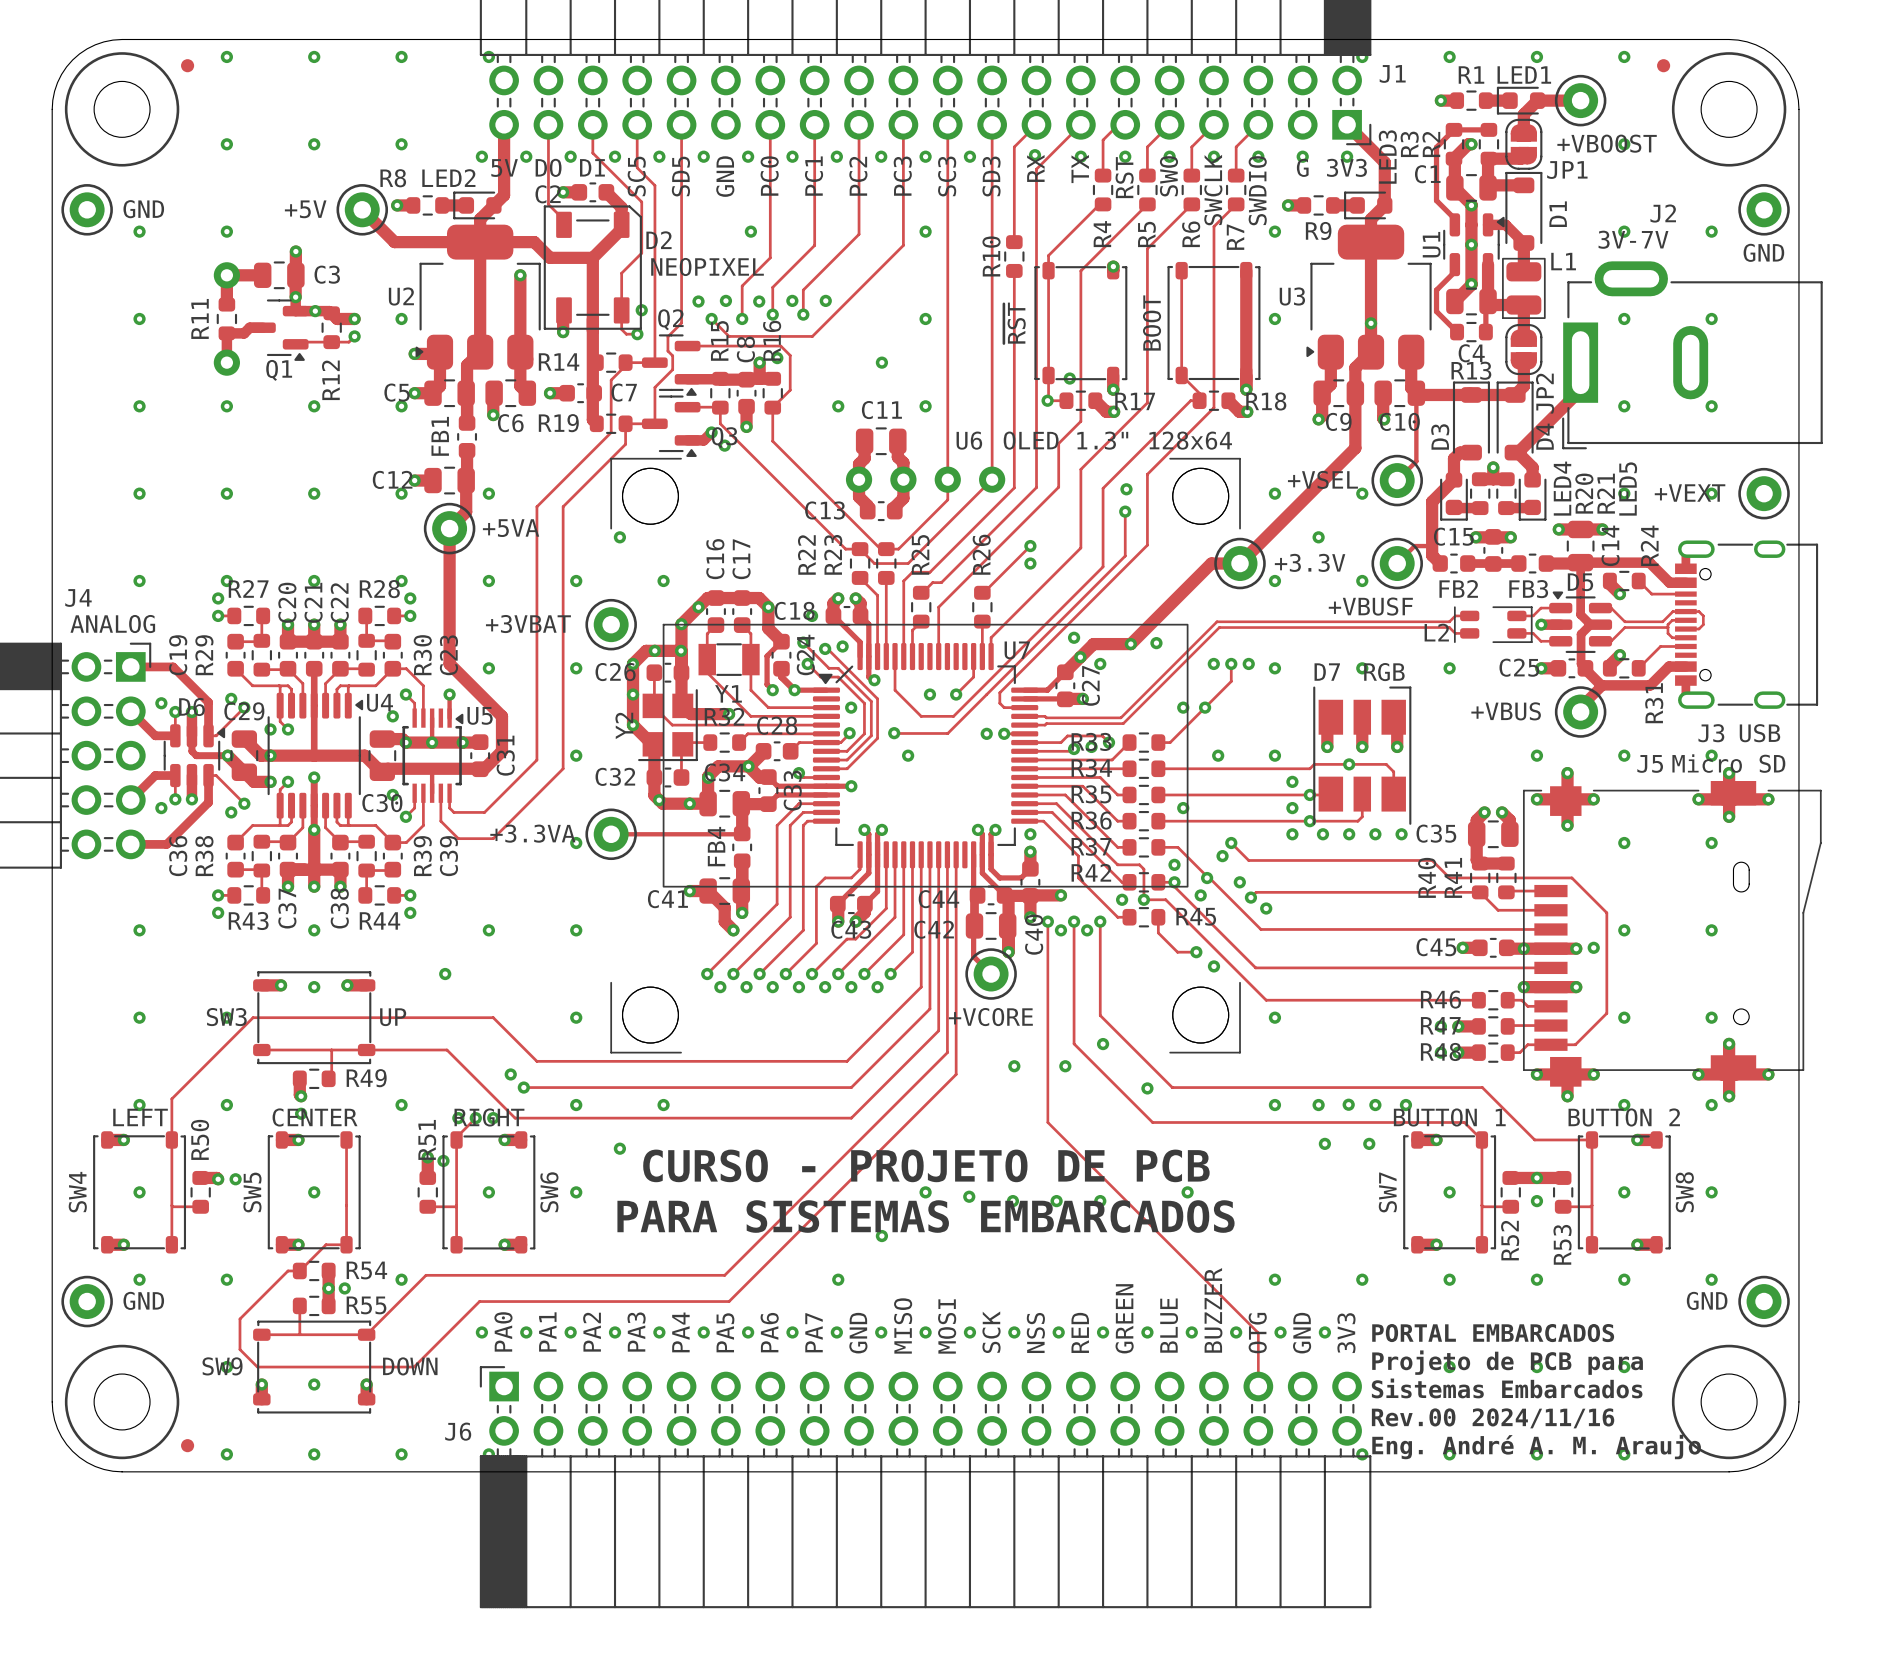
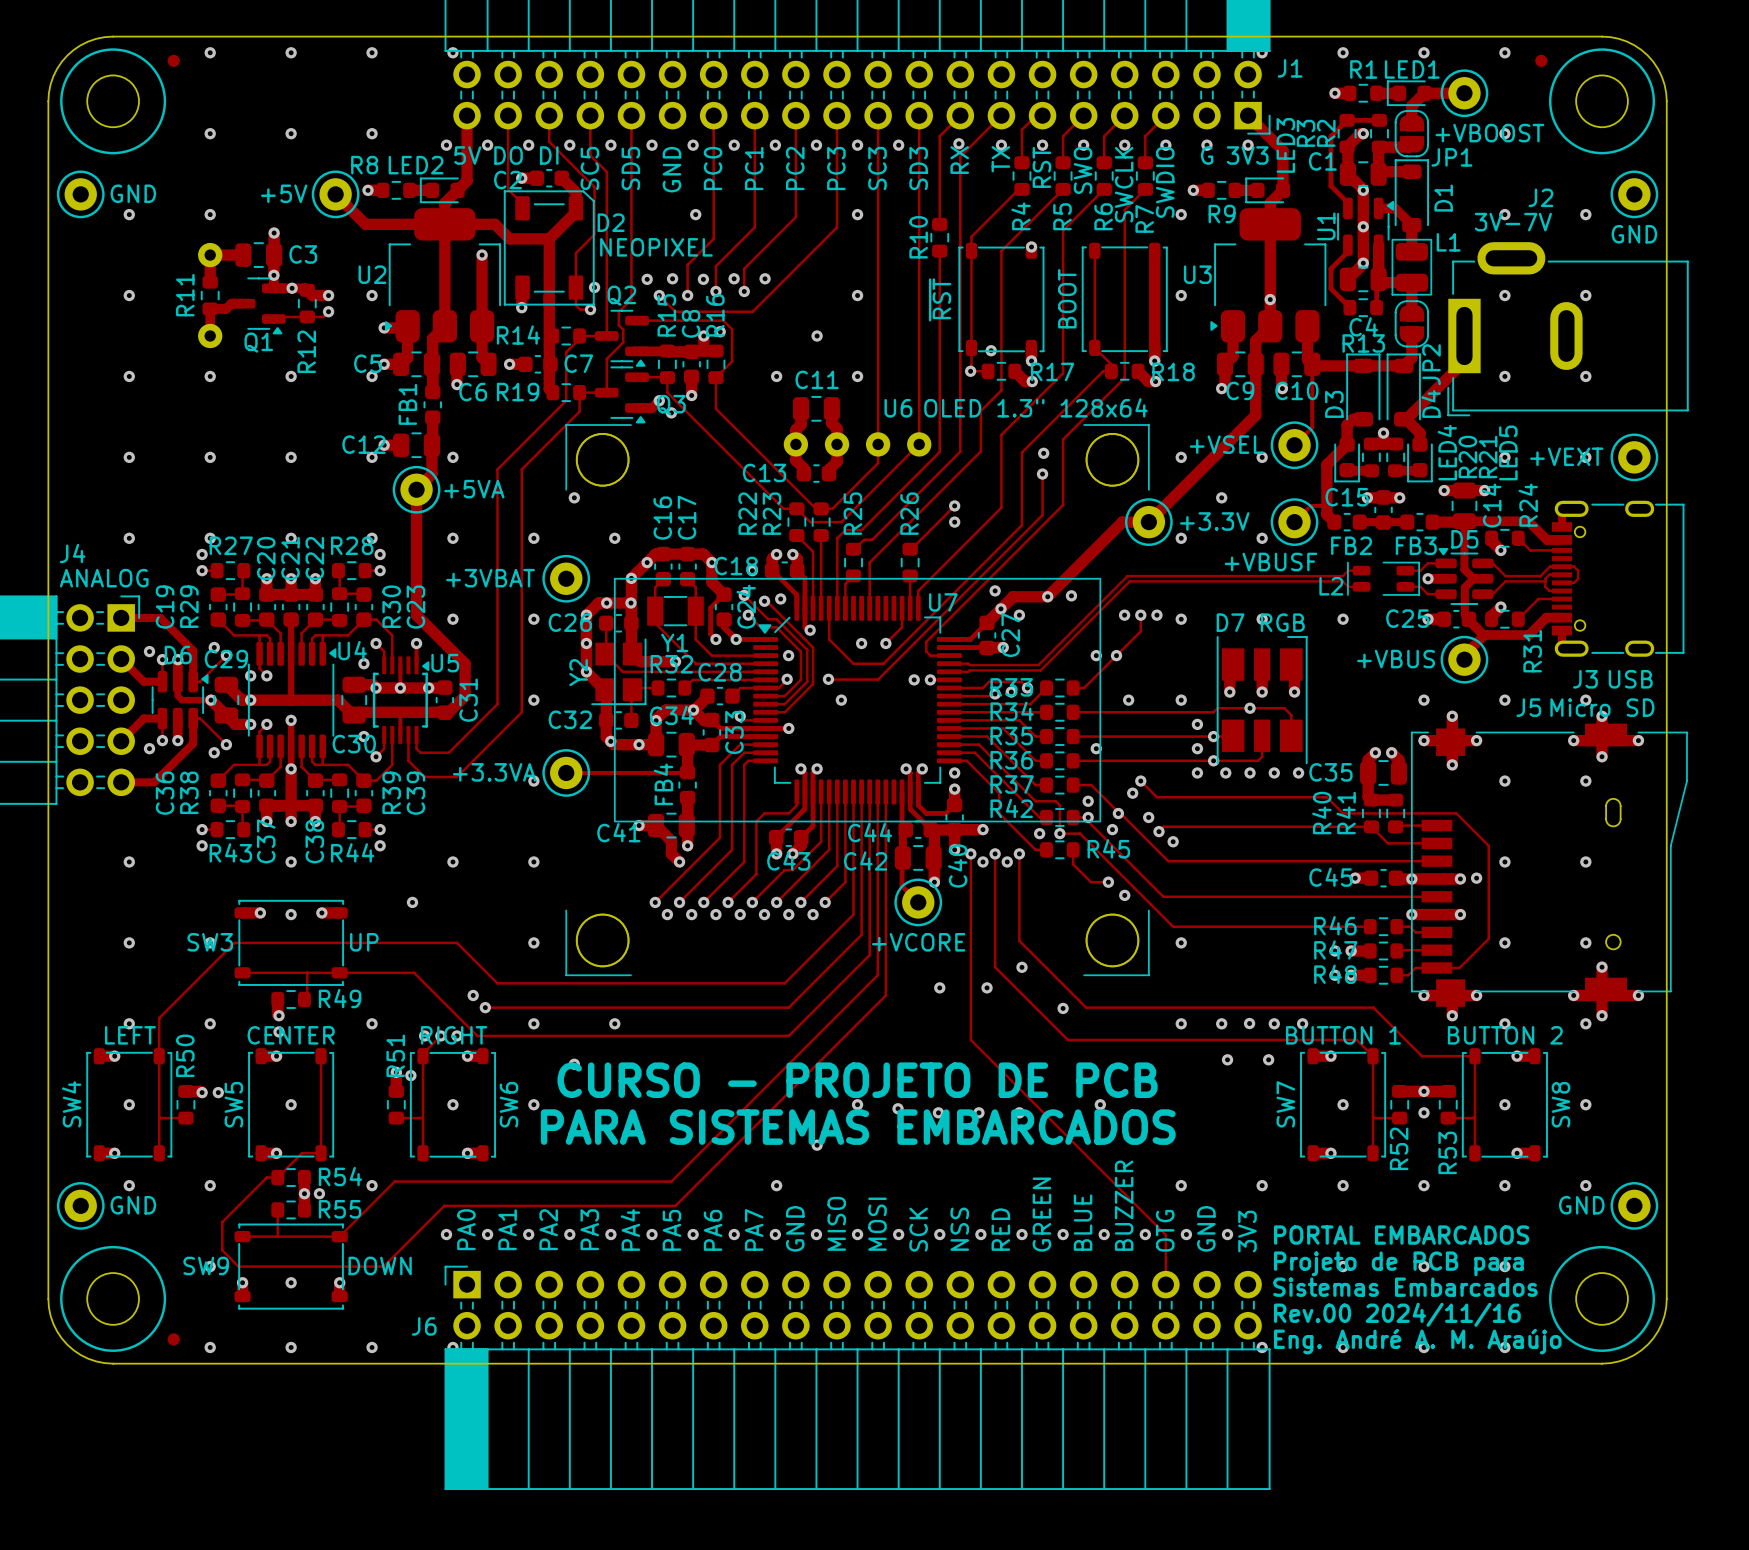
text: Eng. André A. M. Araujo (1536, 1447) -> Eng. André A. M. Araújo (1417, 1341)

